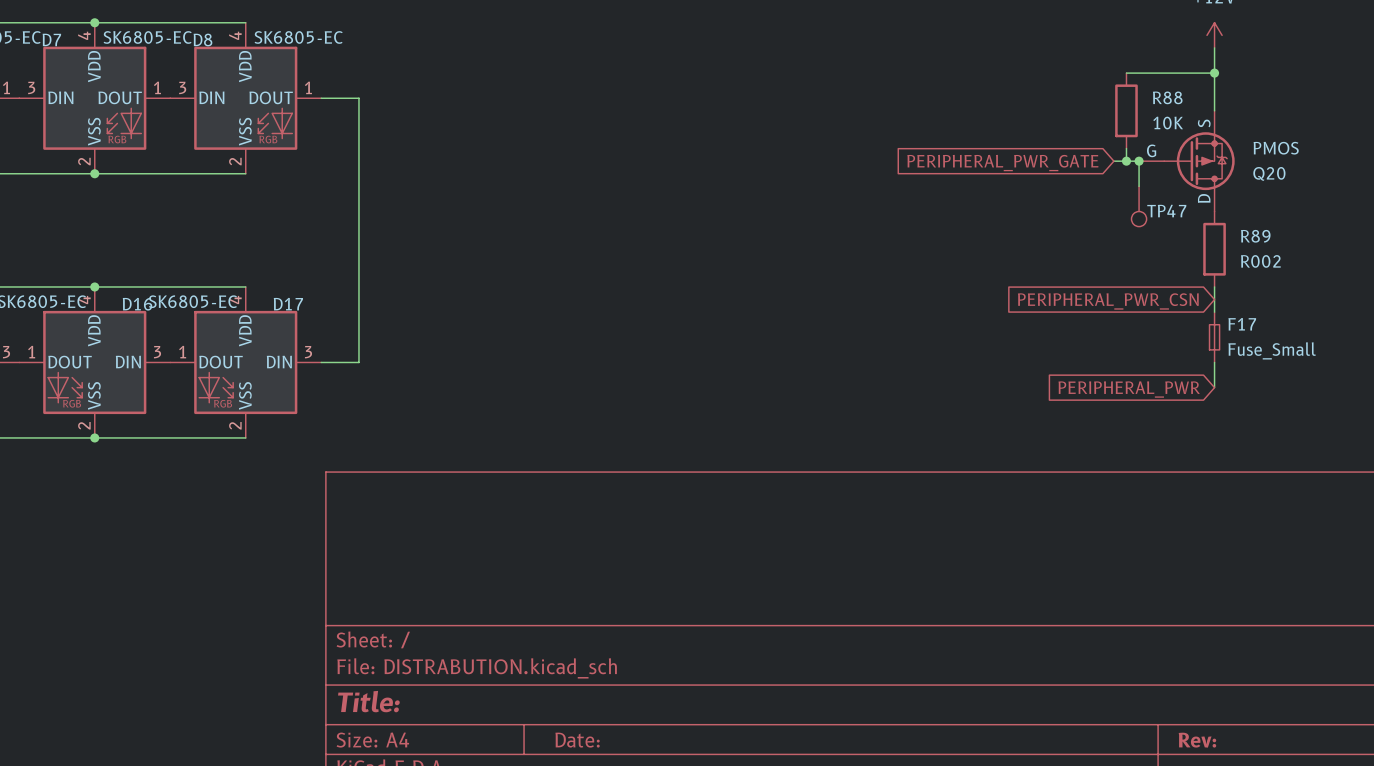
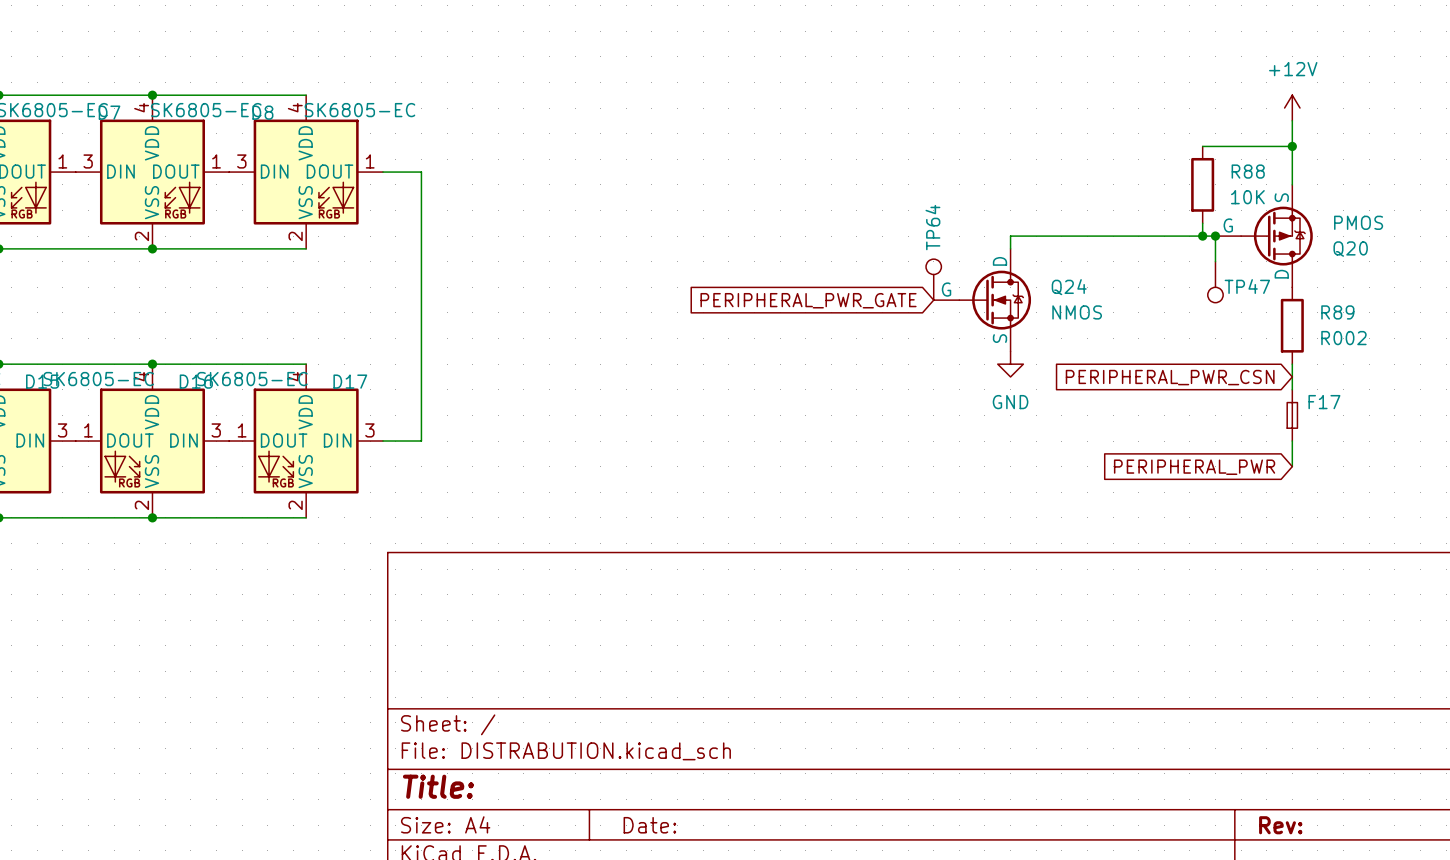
wire: none -> (1189, 236) (1010, 236) (1010, 248)
global label: PERIPHERAL_PWR_GATE (1002, 163) -> none
TP64: none -> (933, 279)
Q24: none -> NMOS (982, 300)
global label: none -> PERIPHERAL_PWR_GATE (808, 300)
power symbol: none -> GND (1010, 364)
F17 value: Fuse_Small (1272, 350) -> none

